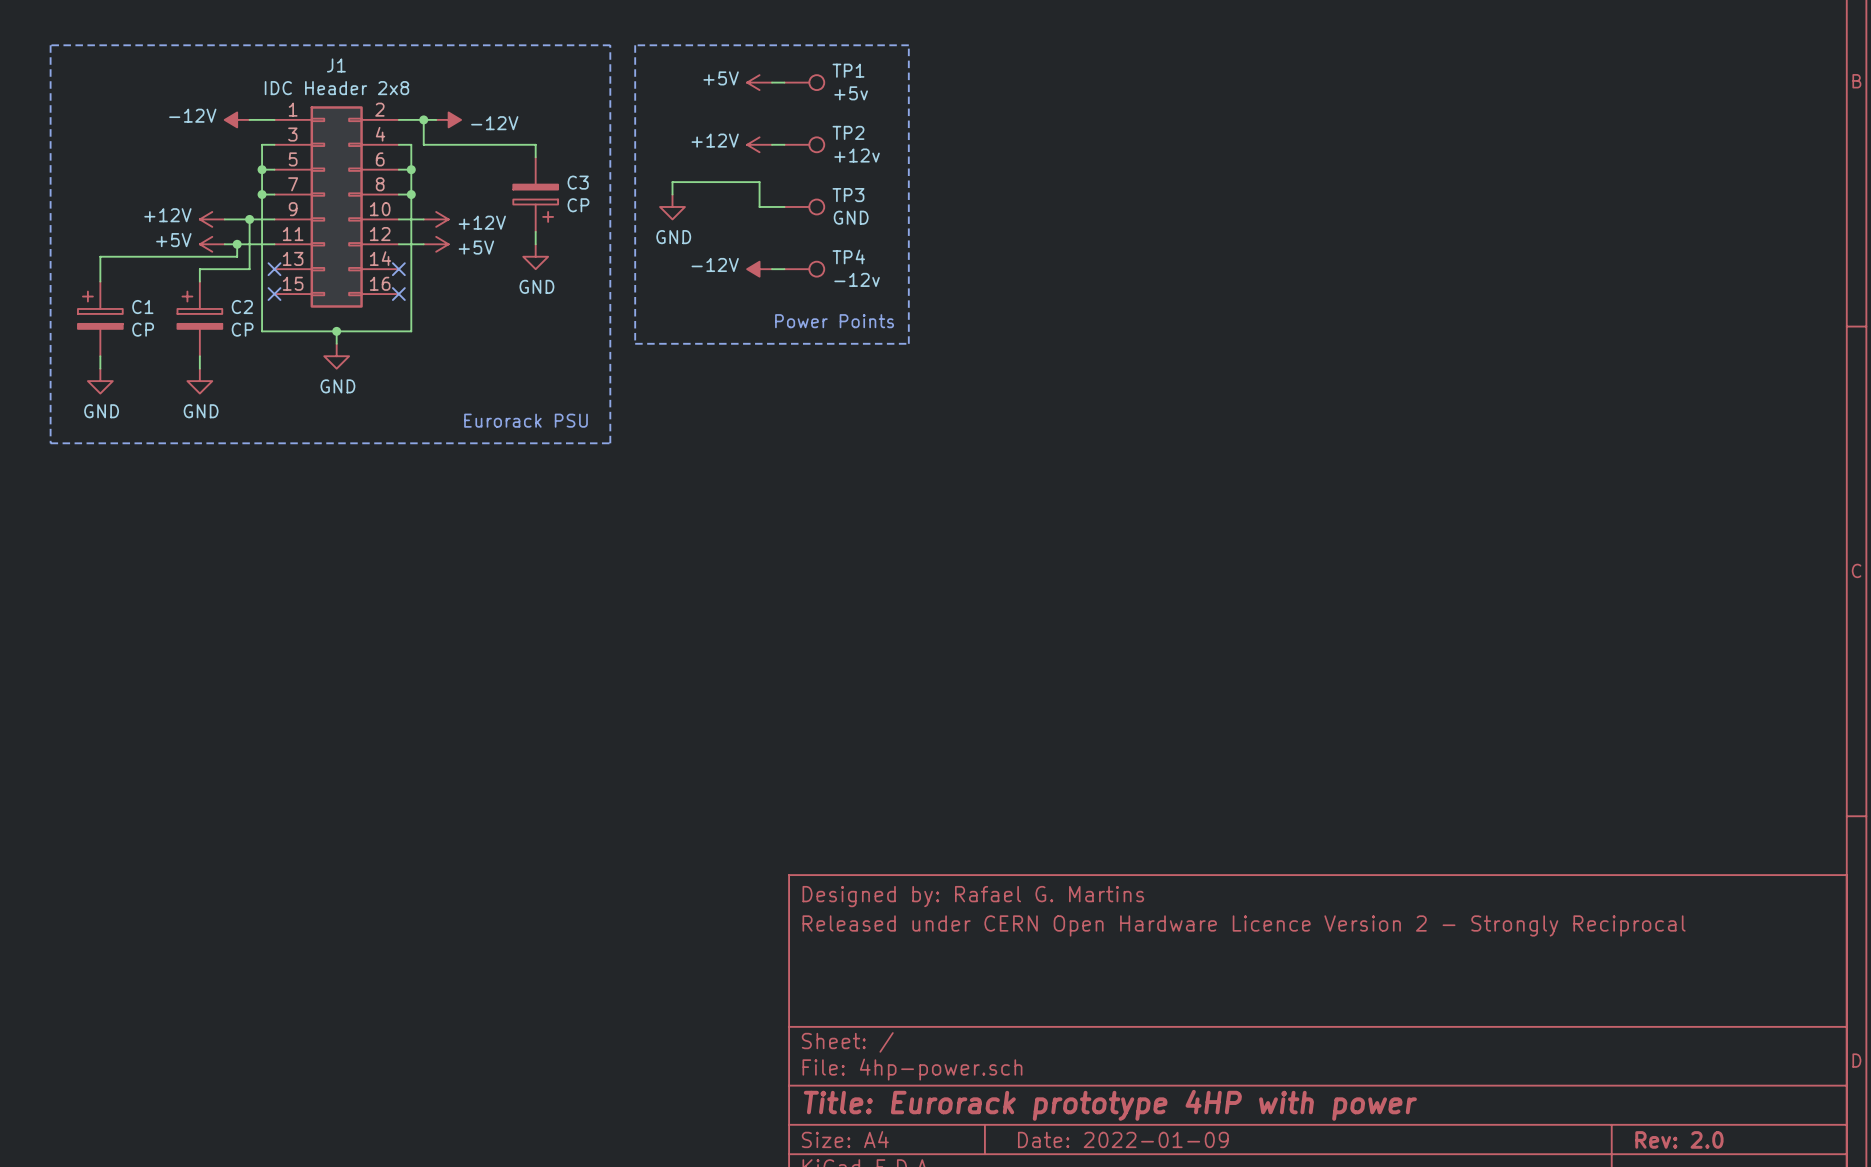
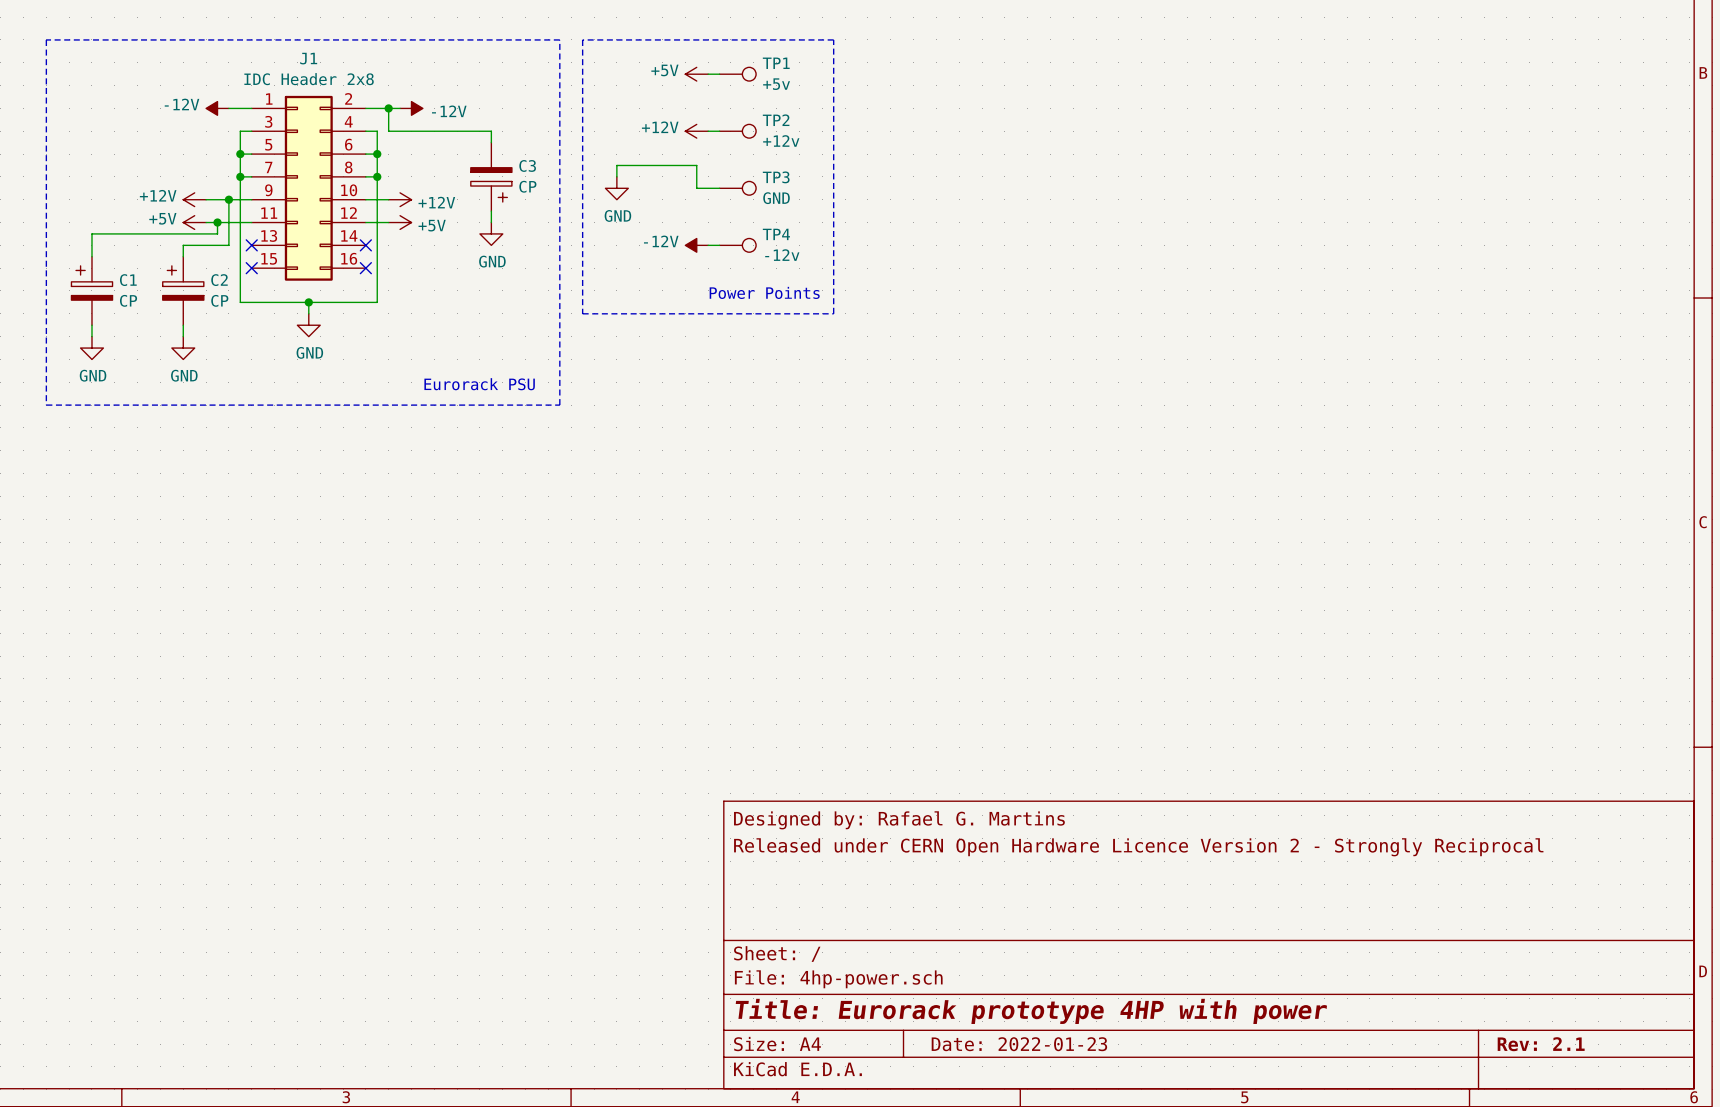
title block: Date: 2022-01-09 (1123, 1139) -> Date: 2022-01-23 (1019, 1044)
title block: Rev: 2.0 (1679, 1139) -> Rev: 2.1 (1541, 1044)

